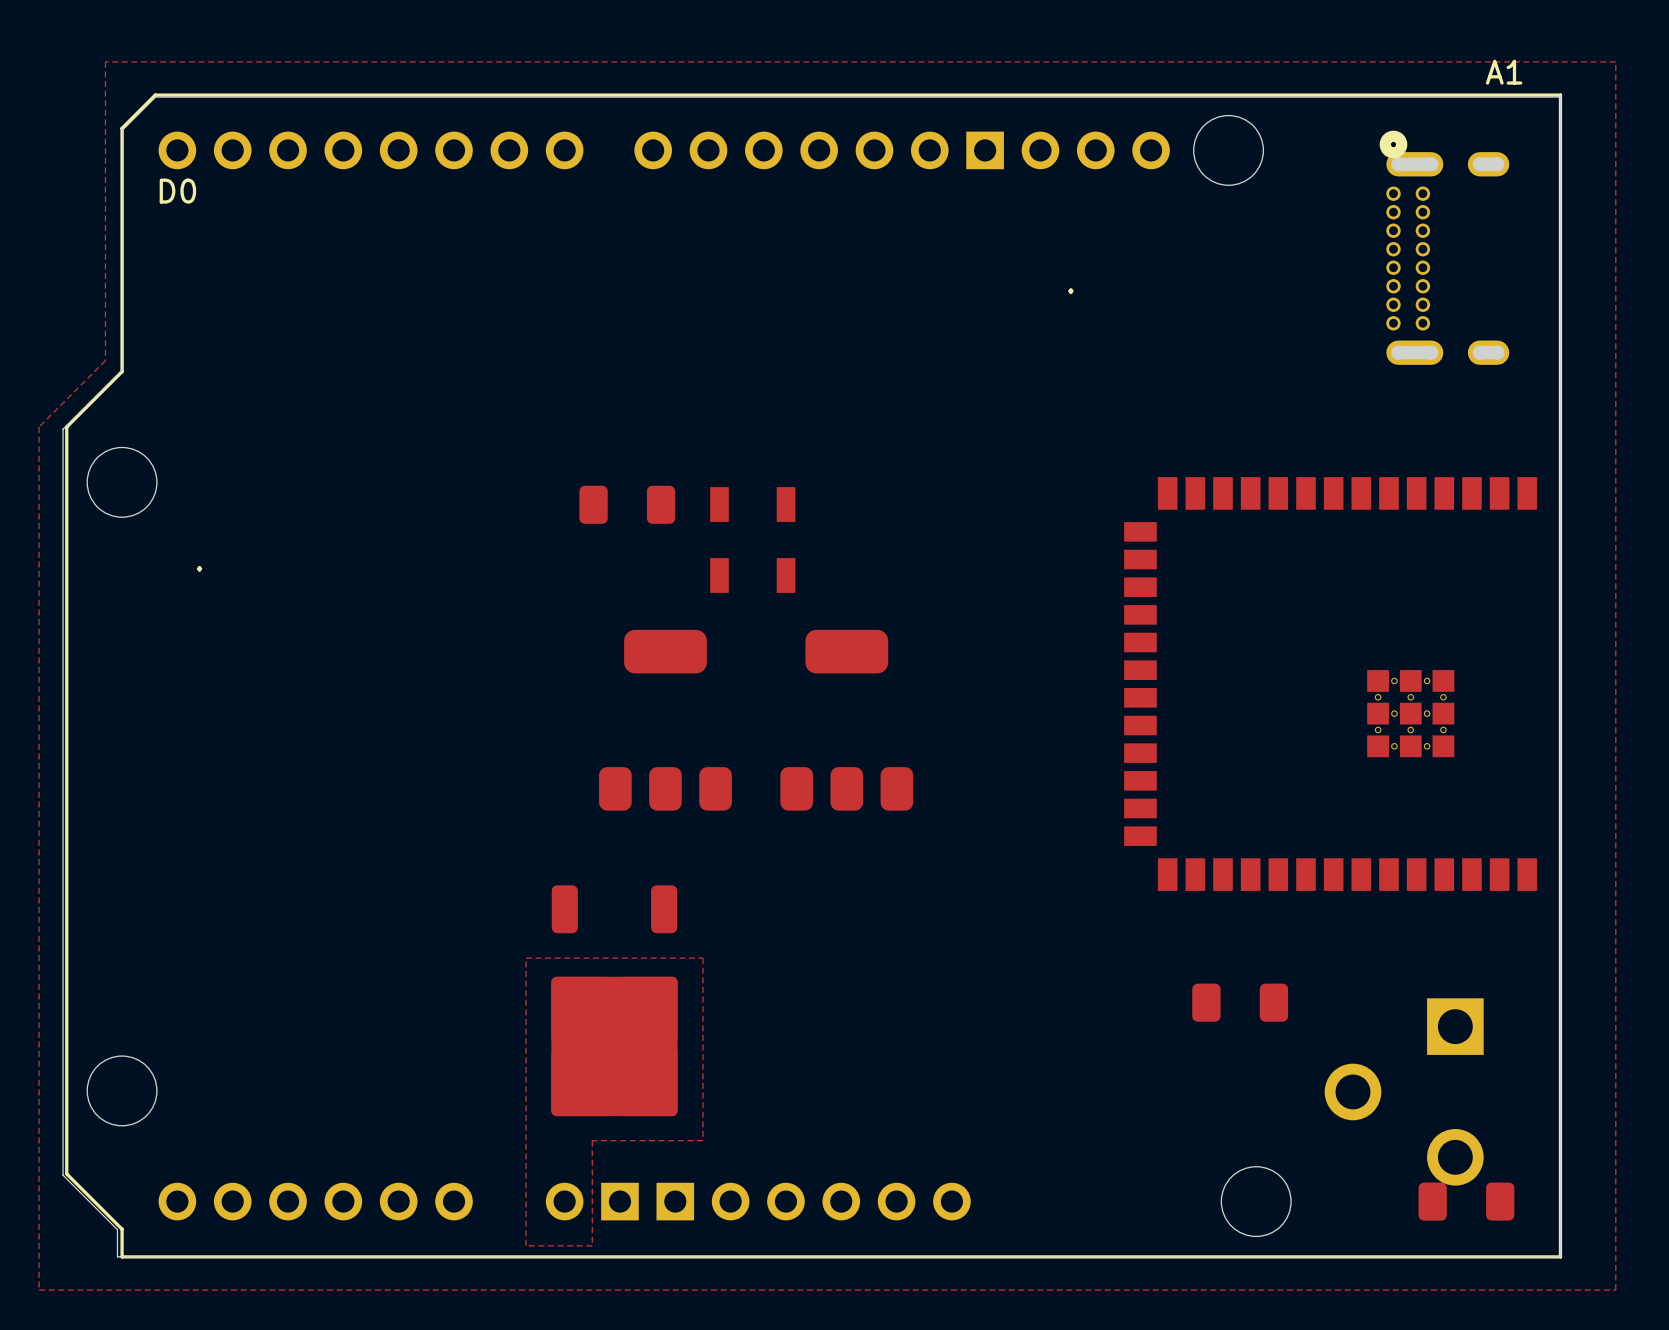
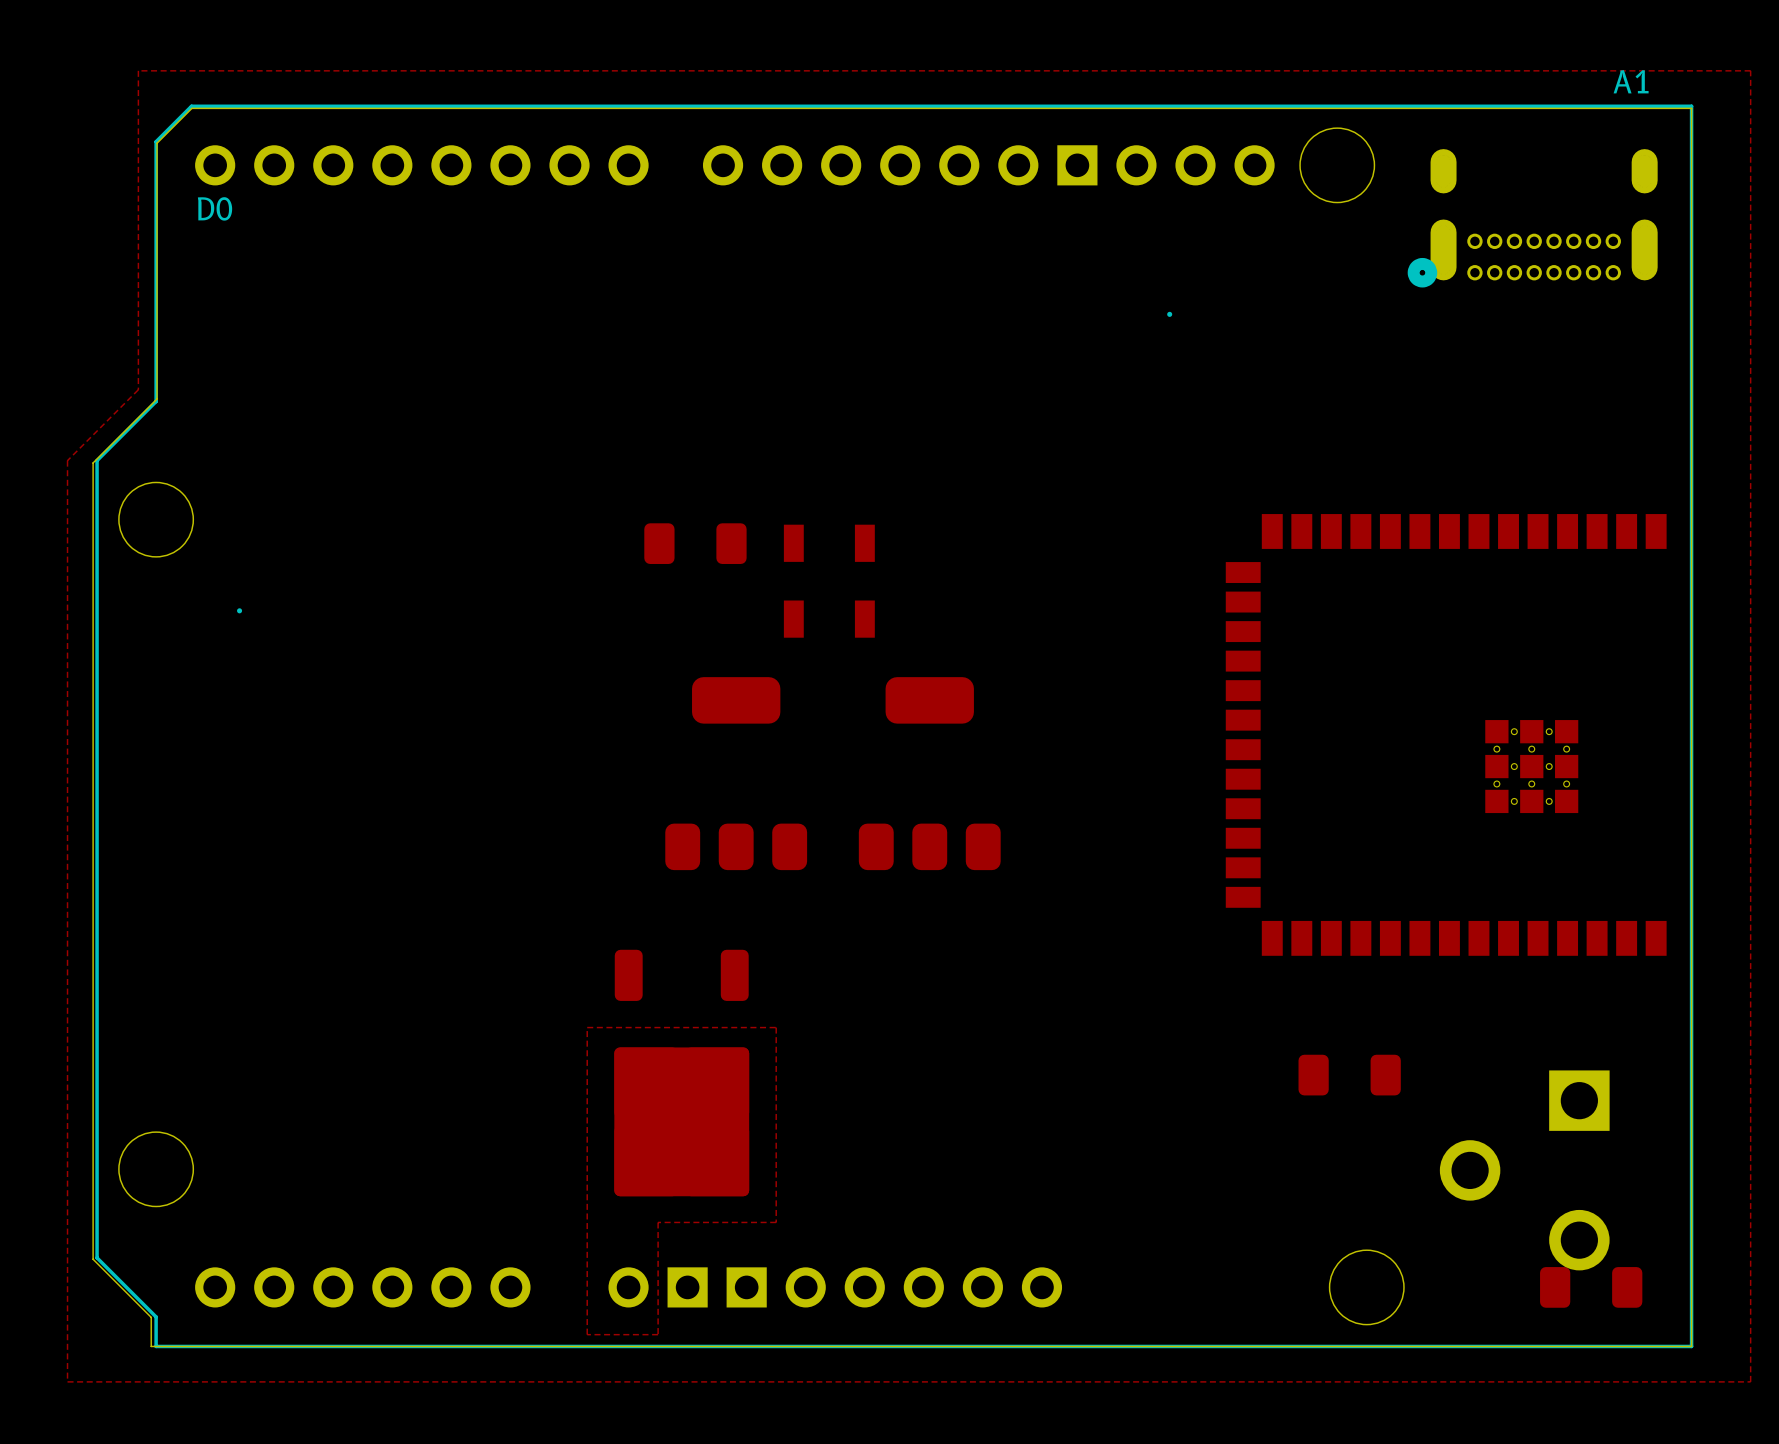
part rotation: 0° (1444, 247) -> 90° counterclockwise (1532, 218)

